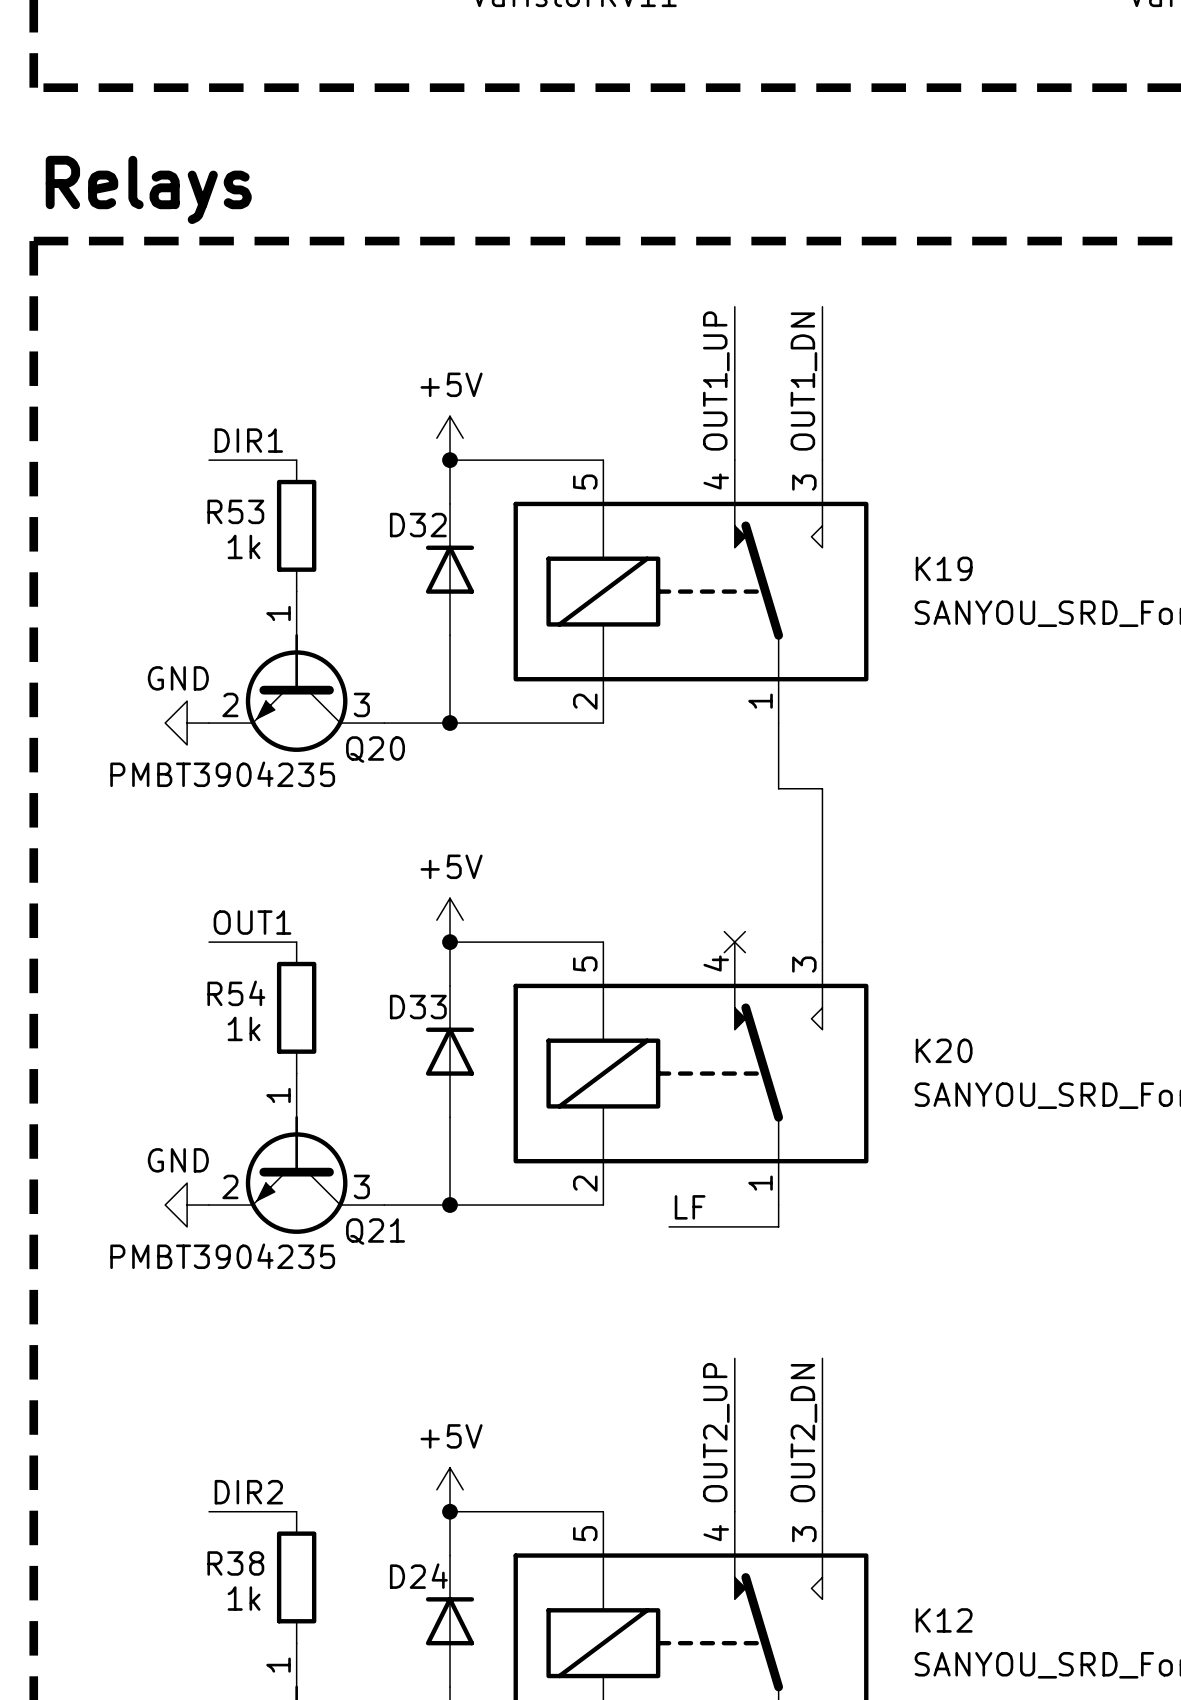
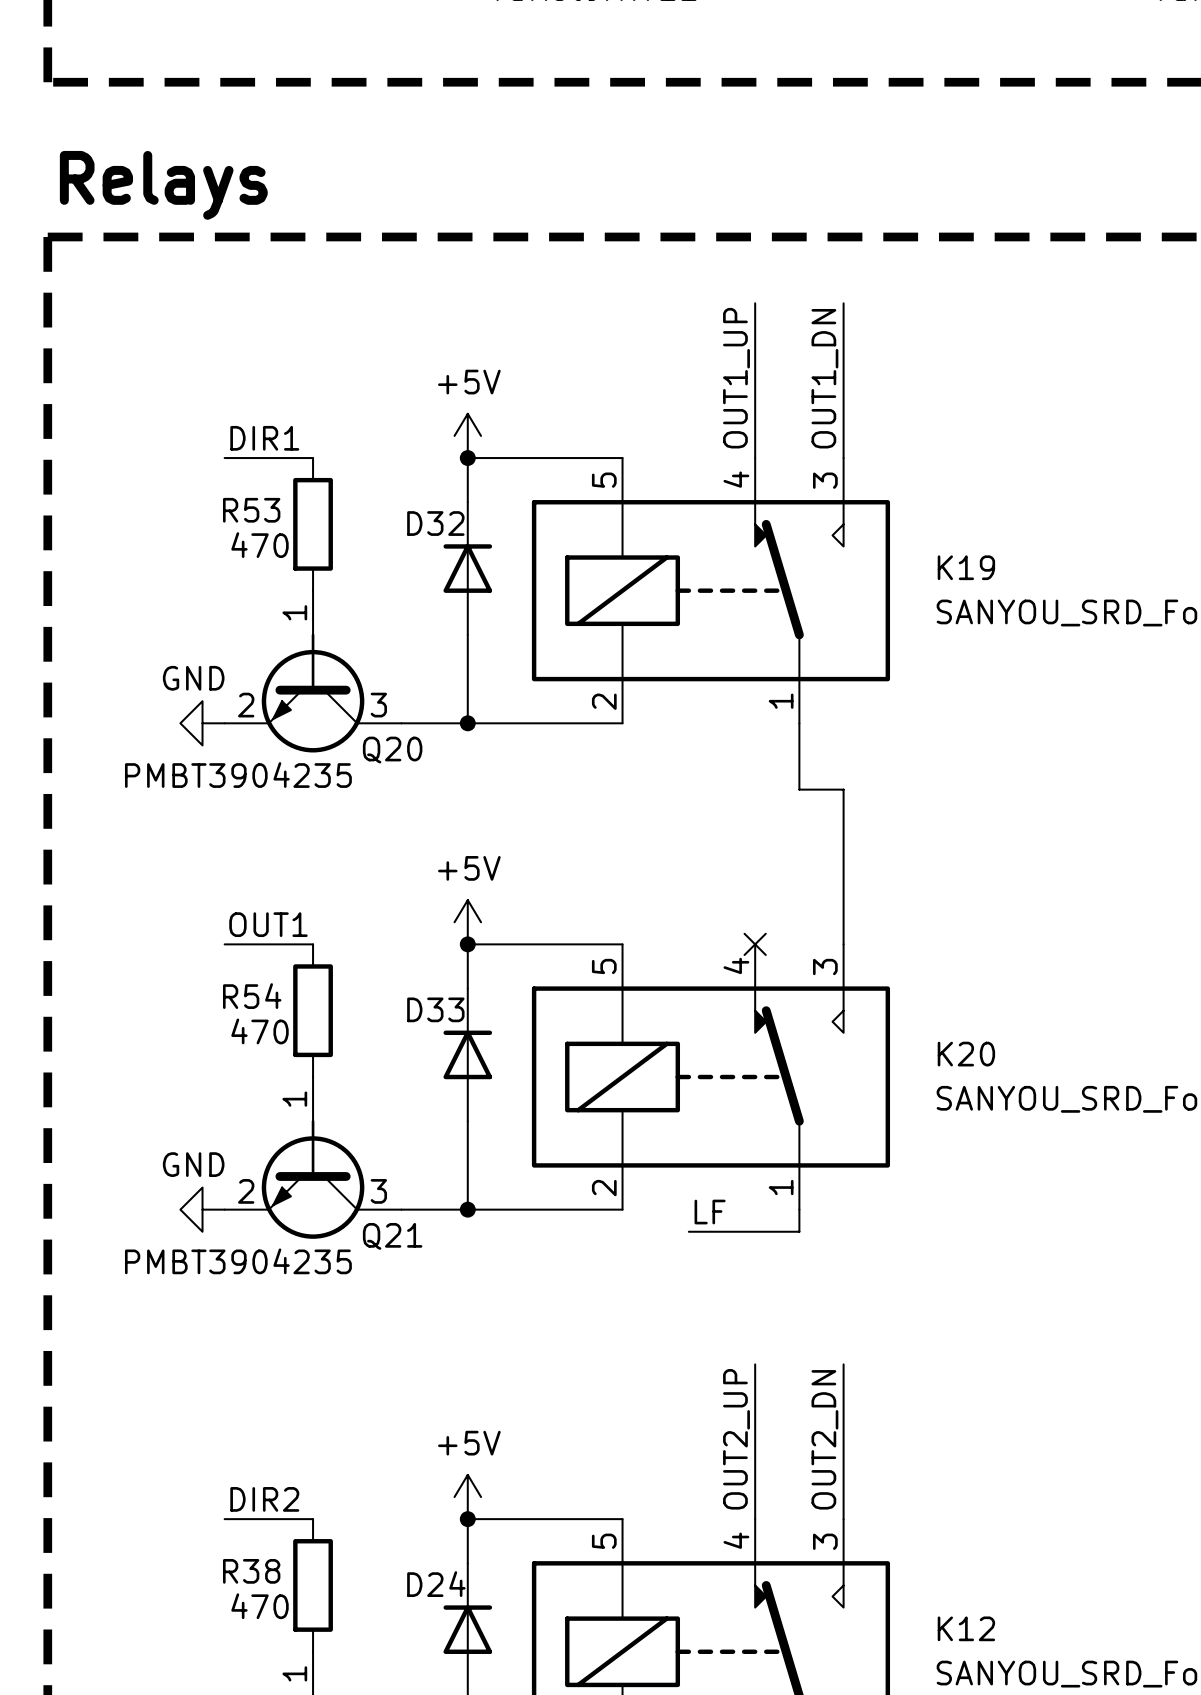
R53 value: 1k (244, 546) -> 470 (259, 545)
R54 value: 1k (244, 1028) -> 470 (259, 1031)
R38 value: 1k (244, 1598) -> 470 (259, 1606)

